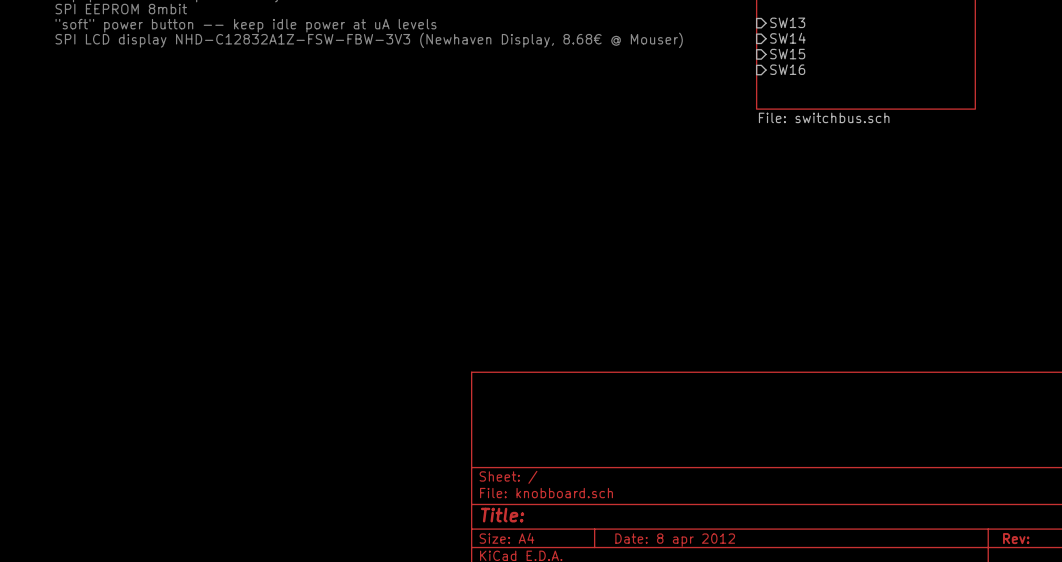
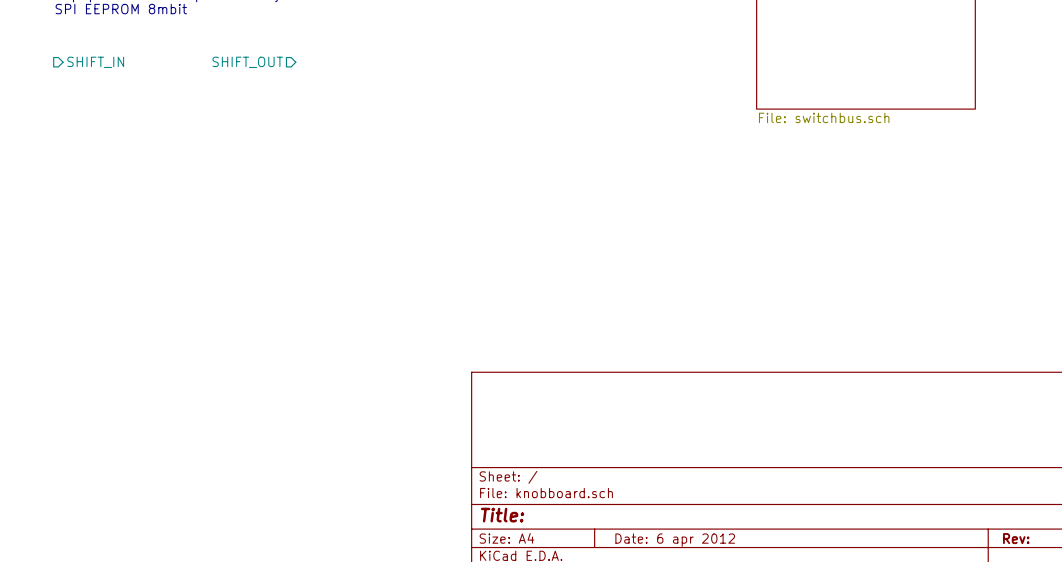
sheet pin: SW13 (787, 22) -> none
text: "soft" power button -- keep idle power at uA levels (246, 25) -> none
sheet pin: SW14 (787, 38) -> none
text: SPI LCD display NHD-C12832A1Z-FSW-FBW-3V3 (Newhaven Display, 8.68€ @ Mouser) (369, 40) -> none
sheet pin: SW15 (787, 54) -> none
sheet pin: none -> SHIFT_IN (95, 62)
sheet pin: none -> SHIFT_OUT (247, 62)
sheet pin: SW16 (787, 69) -> none
title block: Date: 8 apr 2012 (675, 540) -> Date: 6 apr 2012 (675, 540)

